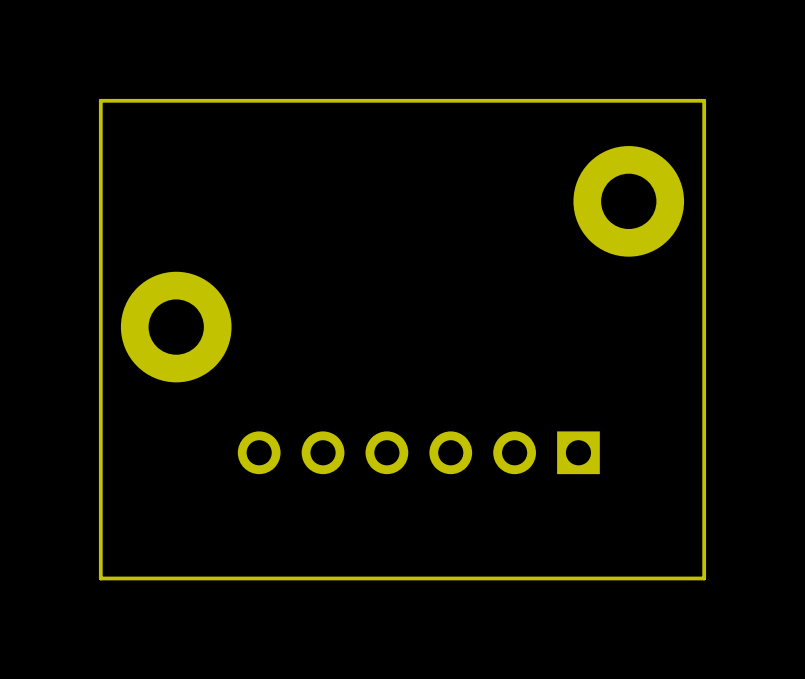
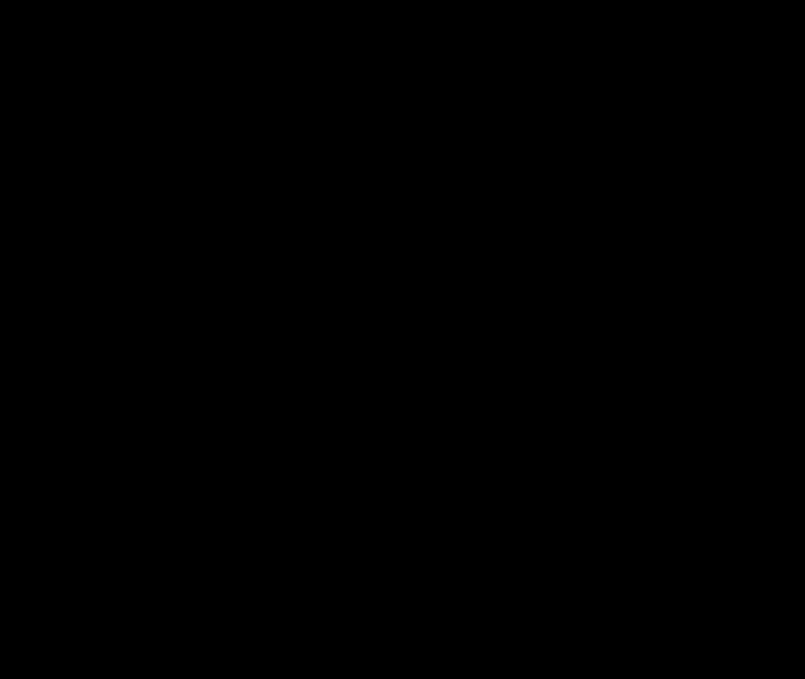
board edge: (704, 100) (100, 100) (100, 578) (704, 578) (704, 100) -> none
part: (628, 201) -> none
part: (176, 327) -> none
part: (418, 452) -> none

